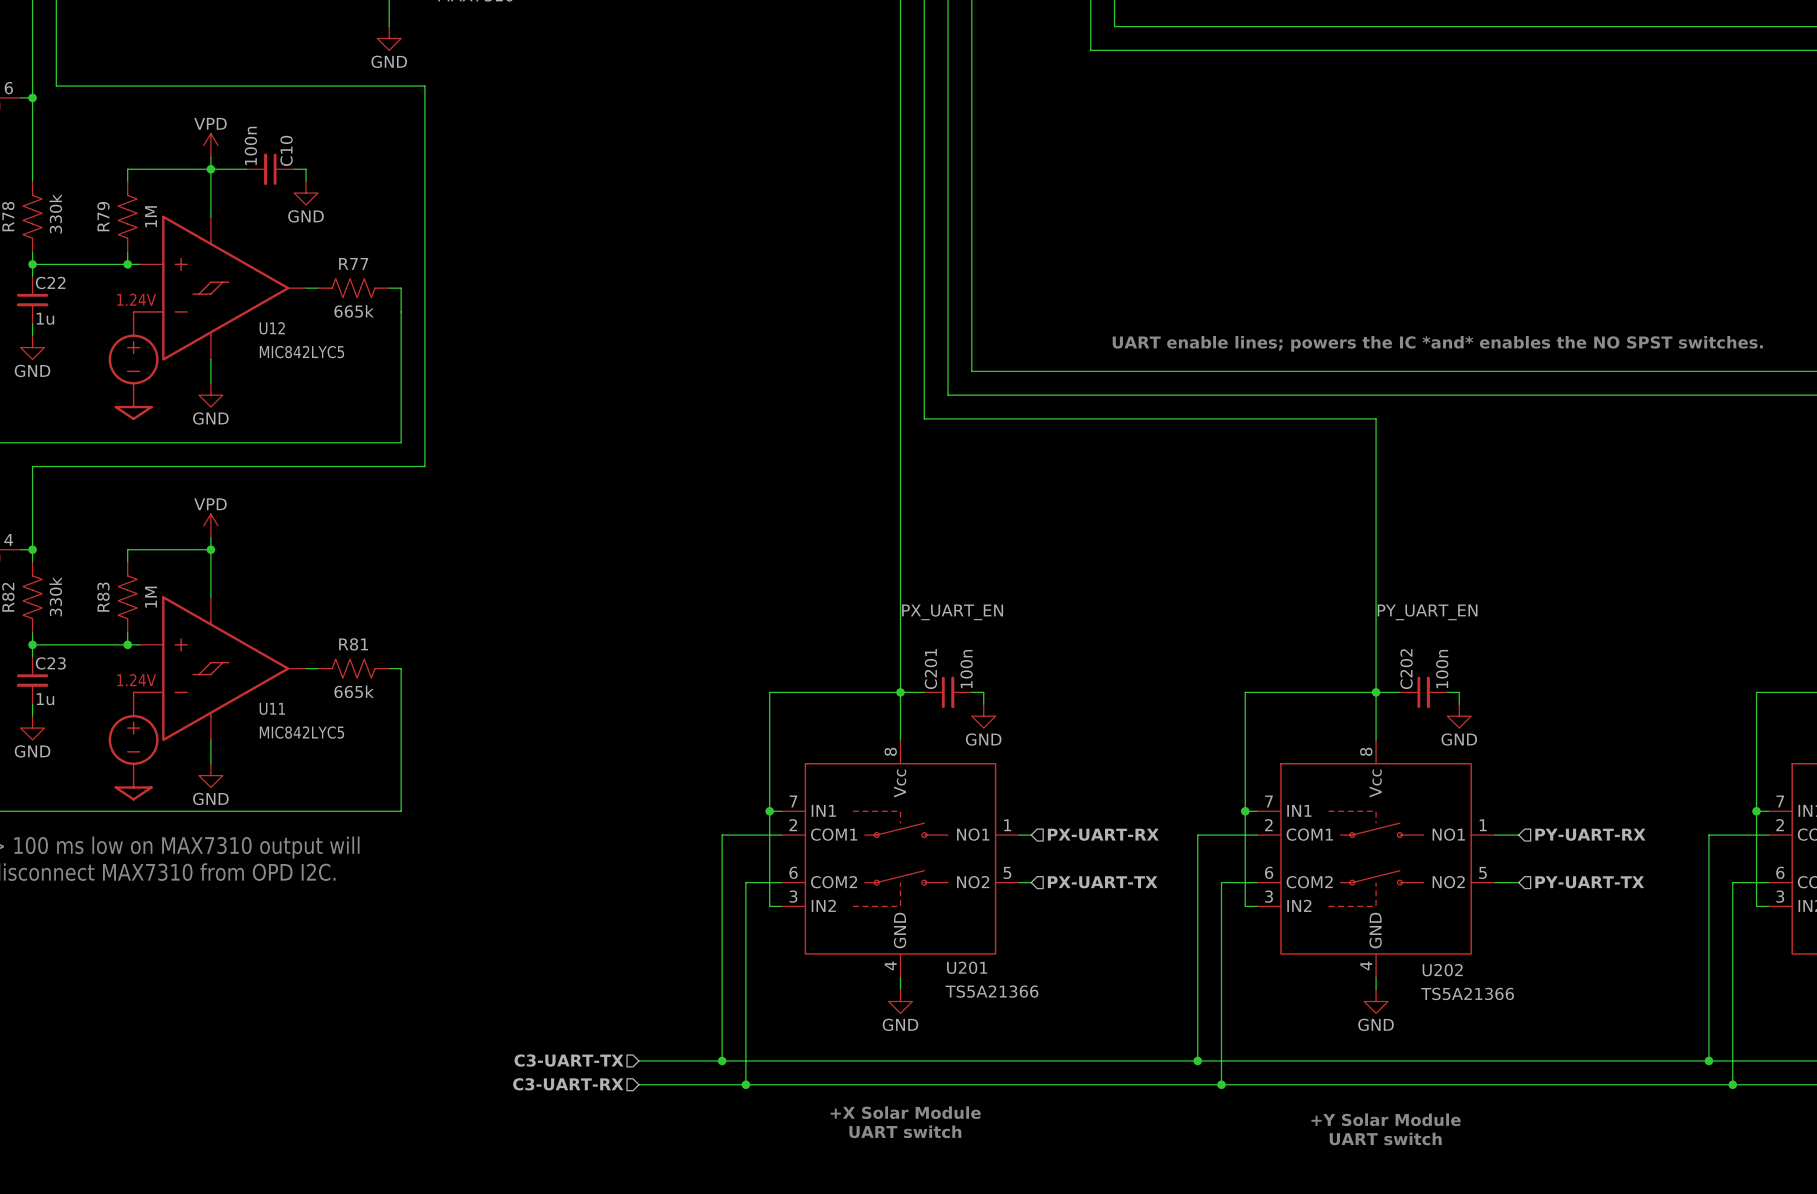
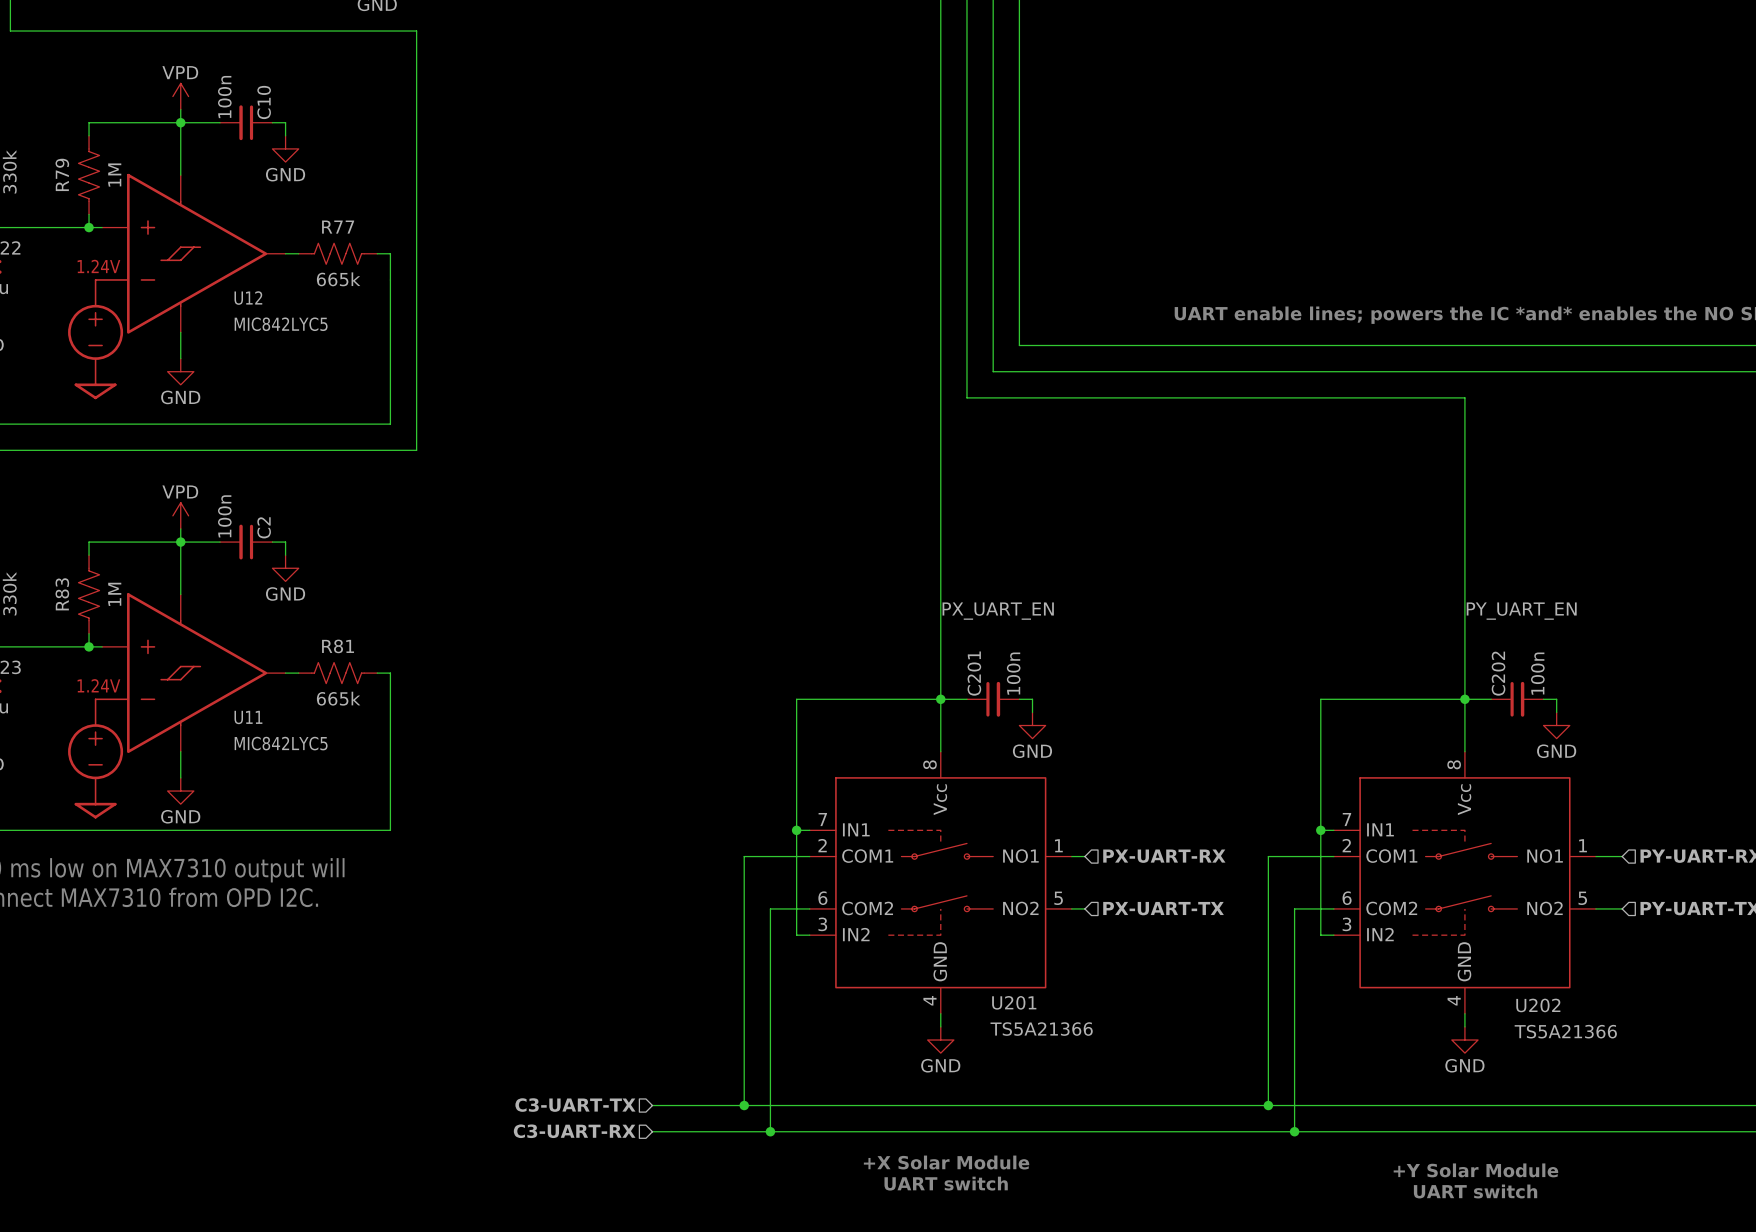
wire: none -> (180, 542) (220, 542)
C2: none -> 100n (246, 542)
wire: none -> (272, 542) (285, 542) (285, 555)
power symbol: none -> GND (285, 568)

